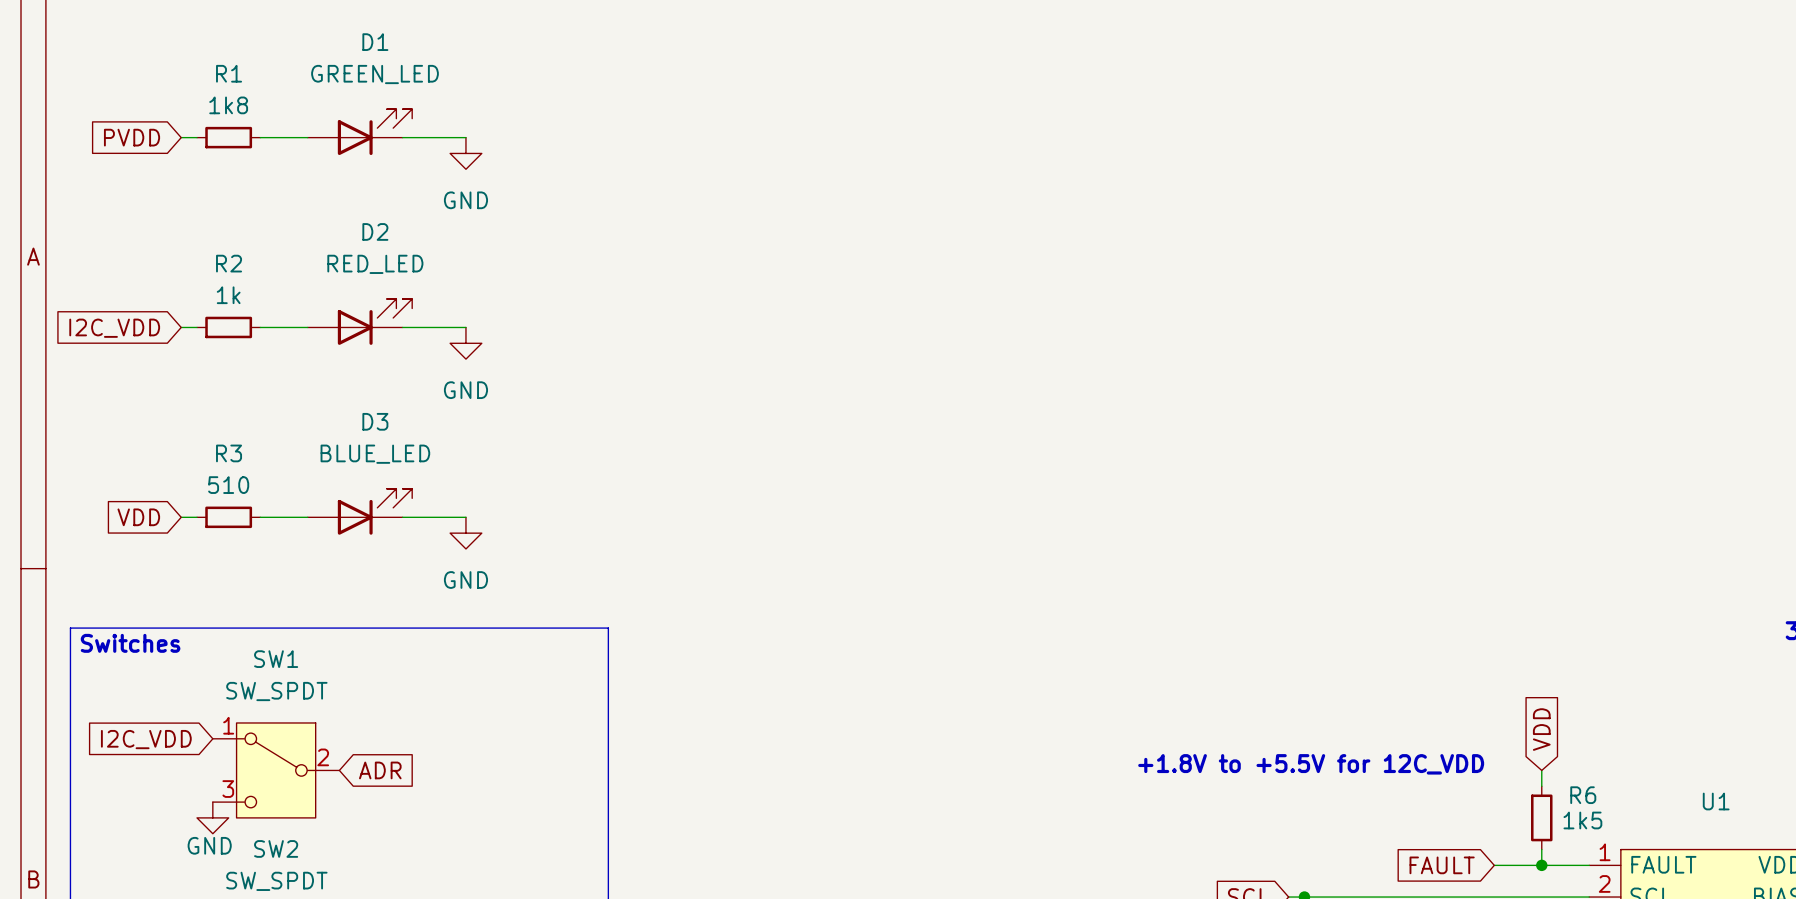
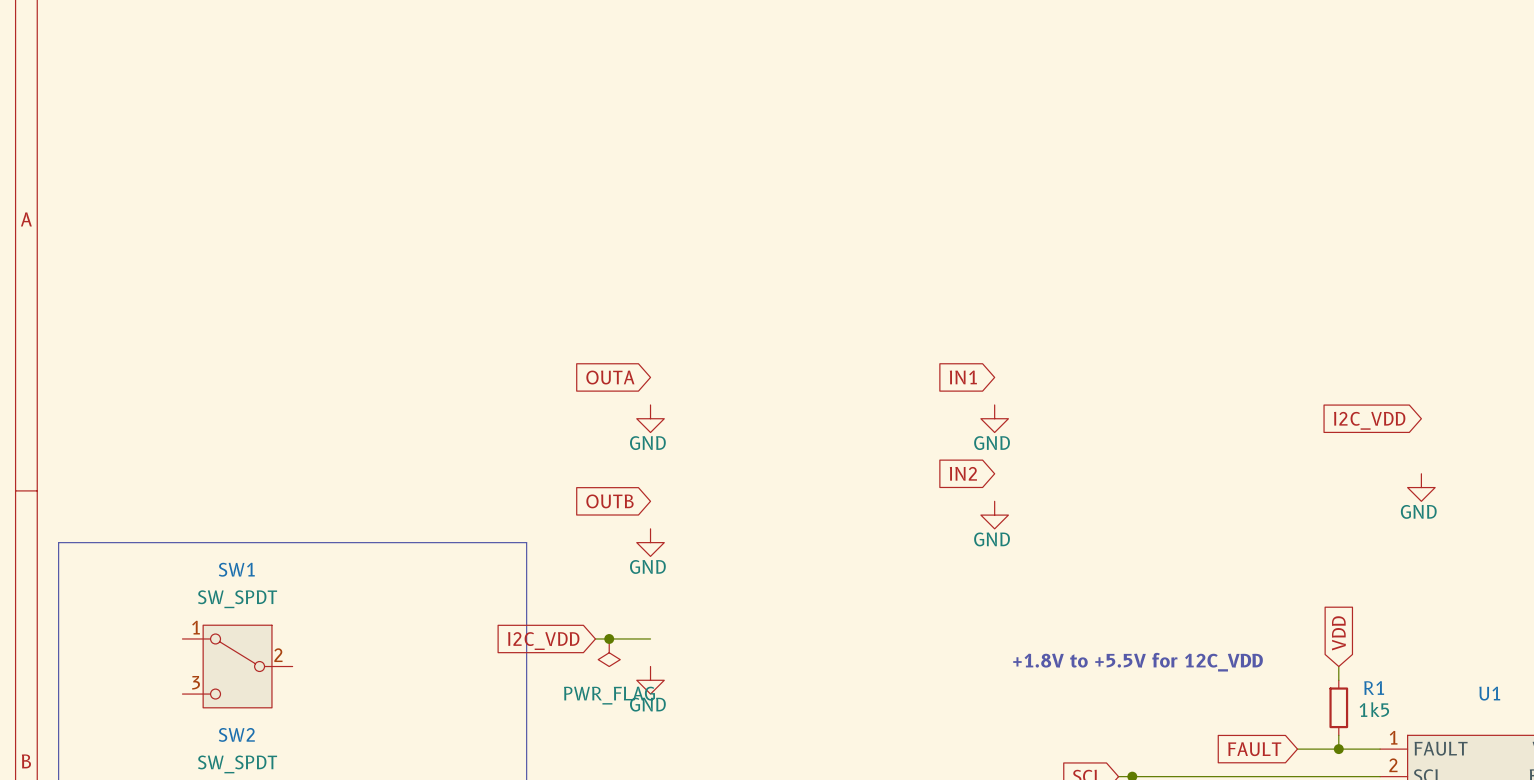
D1: GREEN_LED (359, 132) -> none
global label: PVDD (132, 137) -> none
wire: (181, 137) (197, 137) -> none
R1: 1k8 (228, 137) -> none
wire: (260, 137) (307, 137) -> none
wire: (402, 137) (465, 137) -> none
power symbol: GND (465, 153) -> none
D2: RED_LED (359, 321) -> none
wire: (181, 327) (197, 327) -> none
R2: 1k (228, 327) -> none
wire: (260, 327) (307, 327) -> none
wire: (402, 327) (465, 327) -> none
global label: I2C_VDD (114, 328) -> none
power symbol: GND (465, 343) -> none
global label: none -> OUTA (610, 377)
global label: none -> IN1 (963, 377)
power symbol: none -> GND (650, 418)
power symbol: none -> GND (994, 418)
global label: none -> I2C_VDD (1369, 420)
D3: BLUE_LED (359, 511) -> none
global label: VDD (138, 517) -> none
wire: (181, 517) (197, 517) -> none
R3: 510 (228, 517) -> none
wire: (260, 517) (307, 517) -> none
wire: (402, 517) (465, 517) -> none
power symbol: GND (465, 533) -> none
global label: none -> IN2 (963, 473)
power symbol: none -> GND (1421, 487)
global label: none -> OUTB (609, 501)
power symbol: none -> GND (994, 515)
power symbol: none -> GND (650, 542)
text: Switches (130, 643) -> none
wire: none -> (595, 638) (650, 638)
junction: none -> (609, 638)
global label: I2C_VDD (146, 739) -> none
global label: none -> I2C_VDD (543, 641)
power symbol: none -> PWR_FLAG (609, 652)
global label: ADR (380, 770) -> none
power symbol: none -> GND (650, 680)
R6 name: R6 (1583, 795) -> R1 (1374, 688)
power symbol: GND (212, 817) -> none

